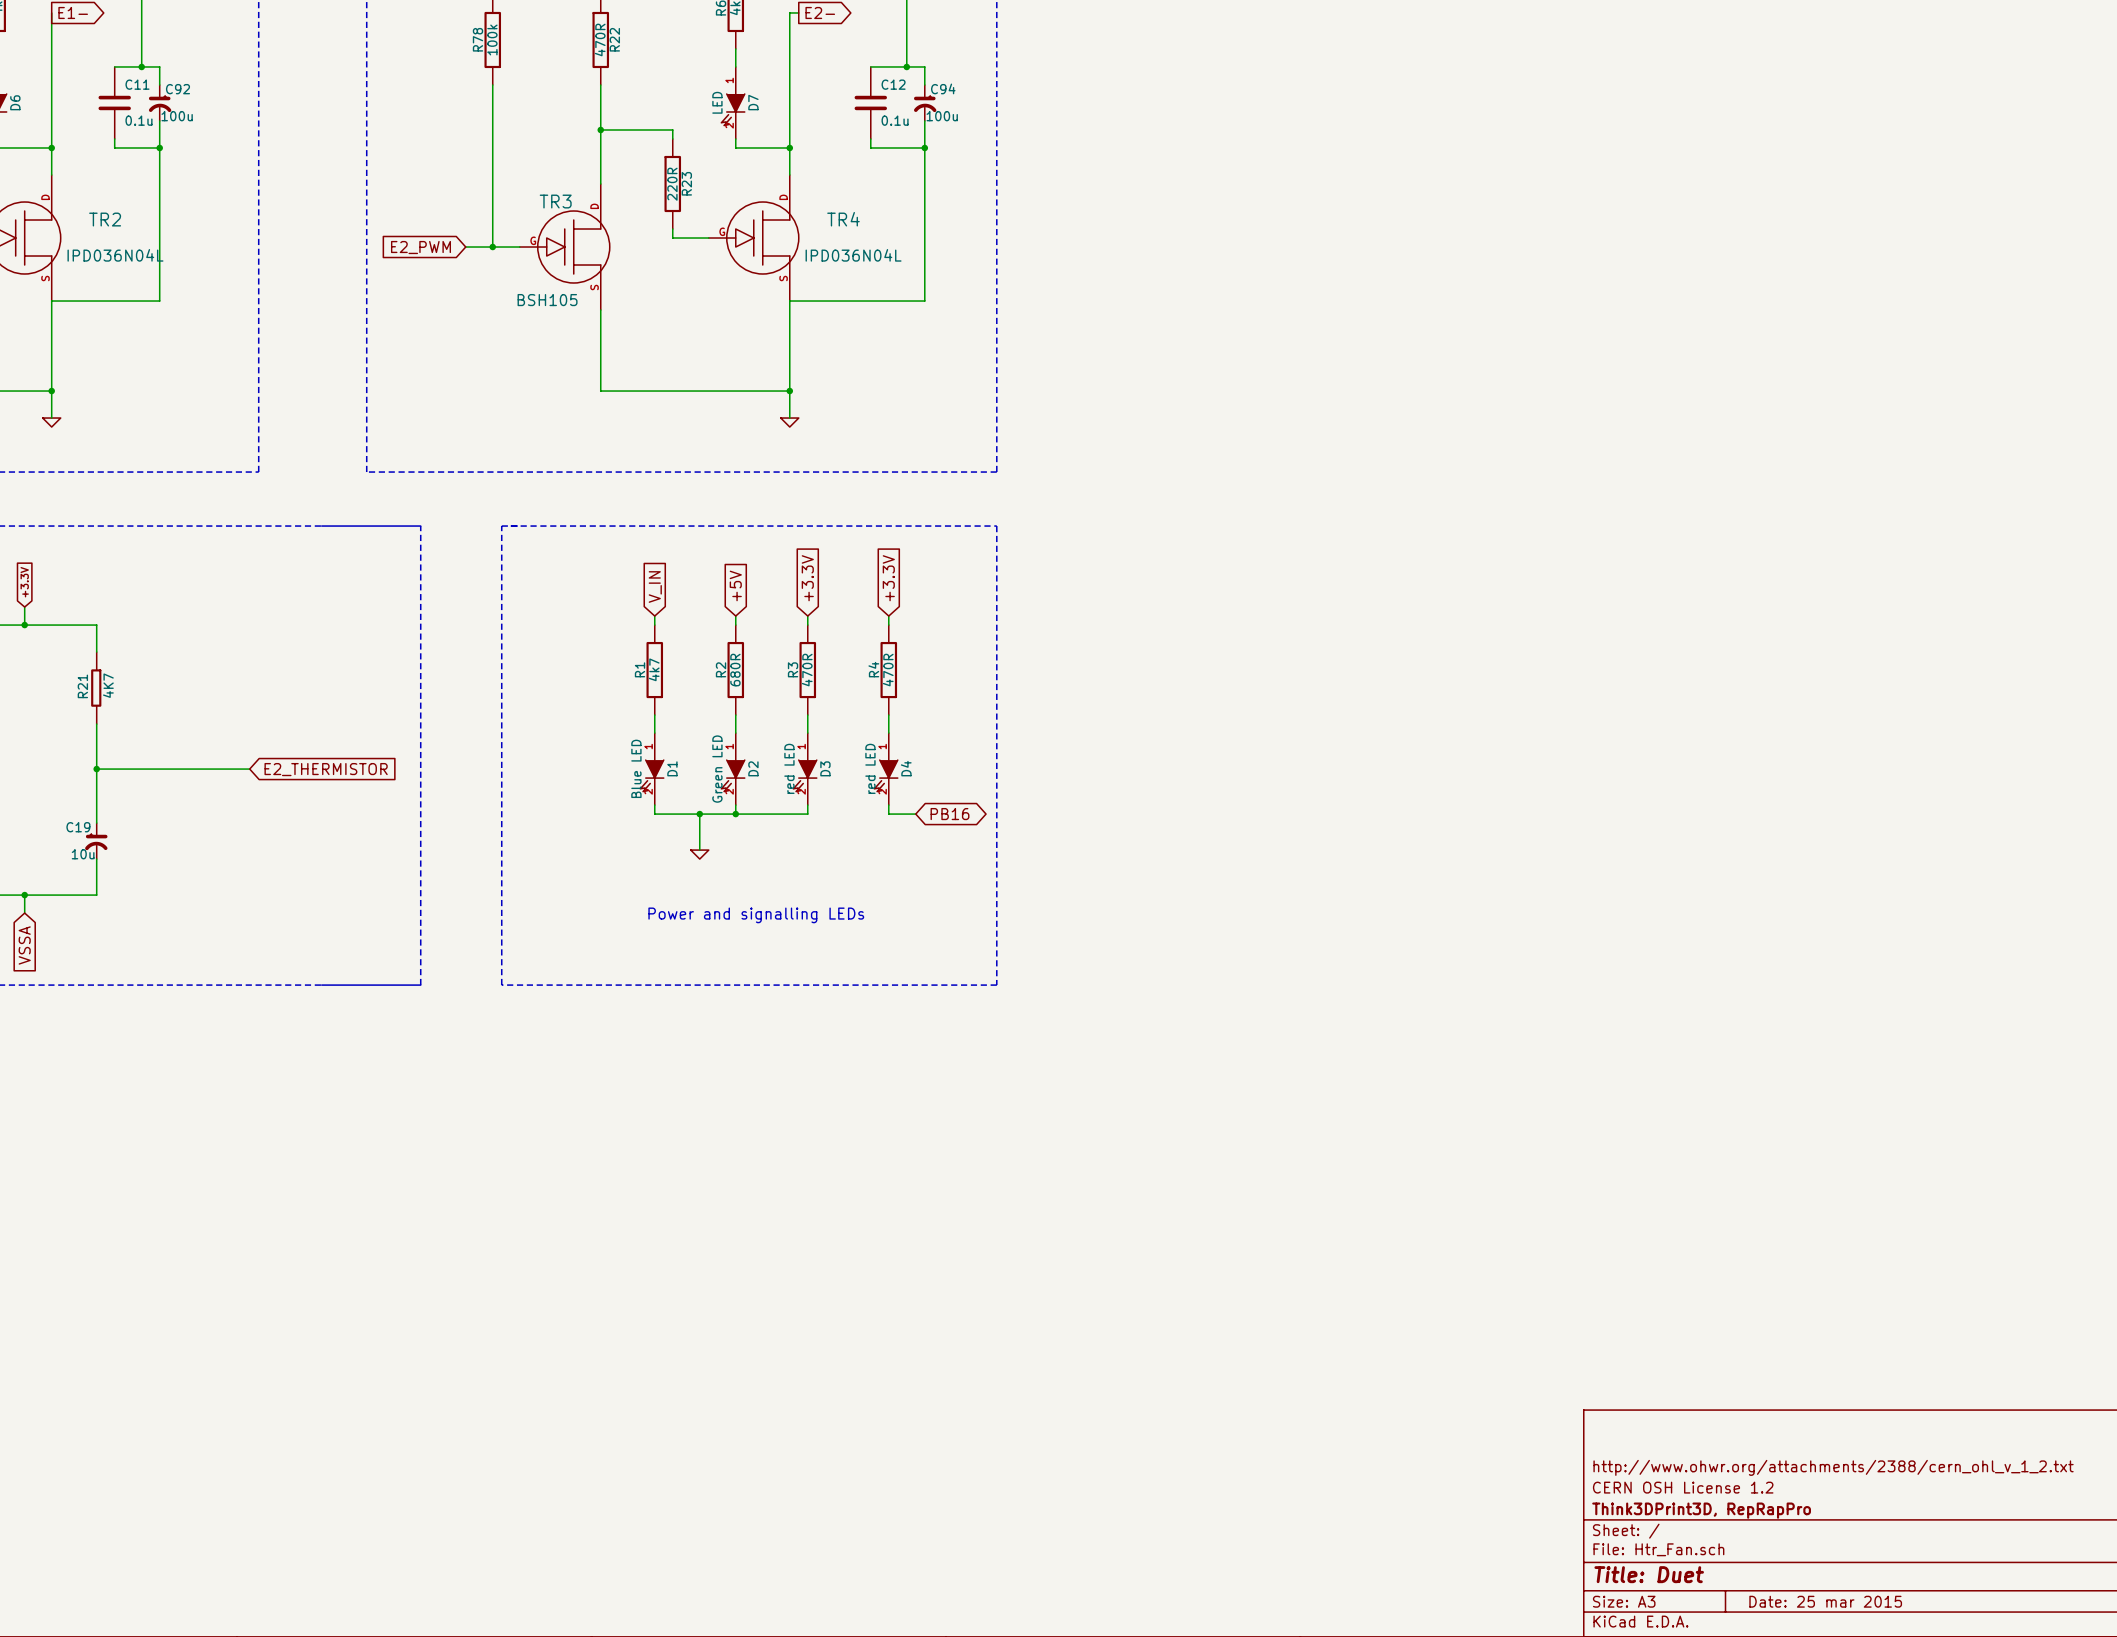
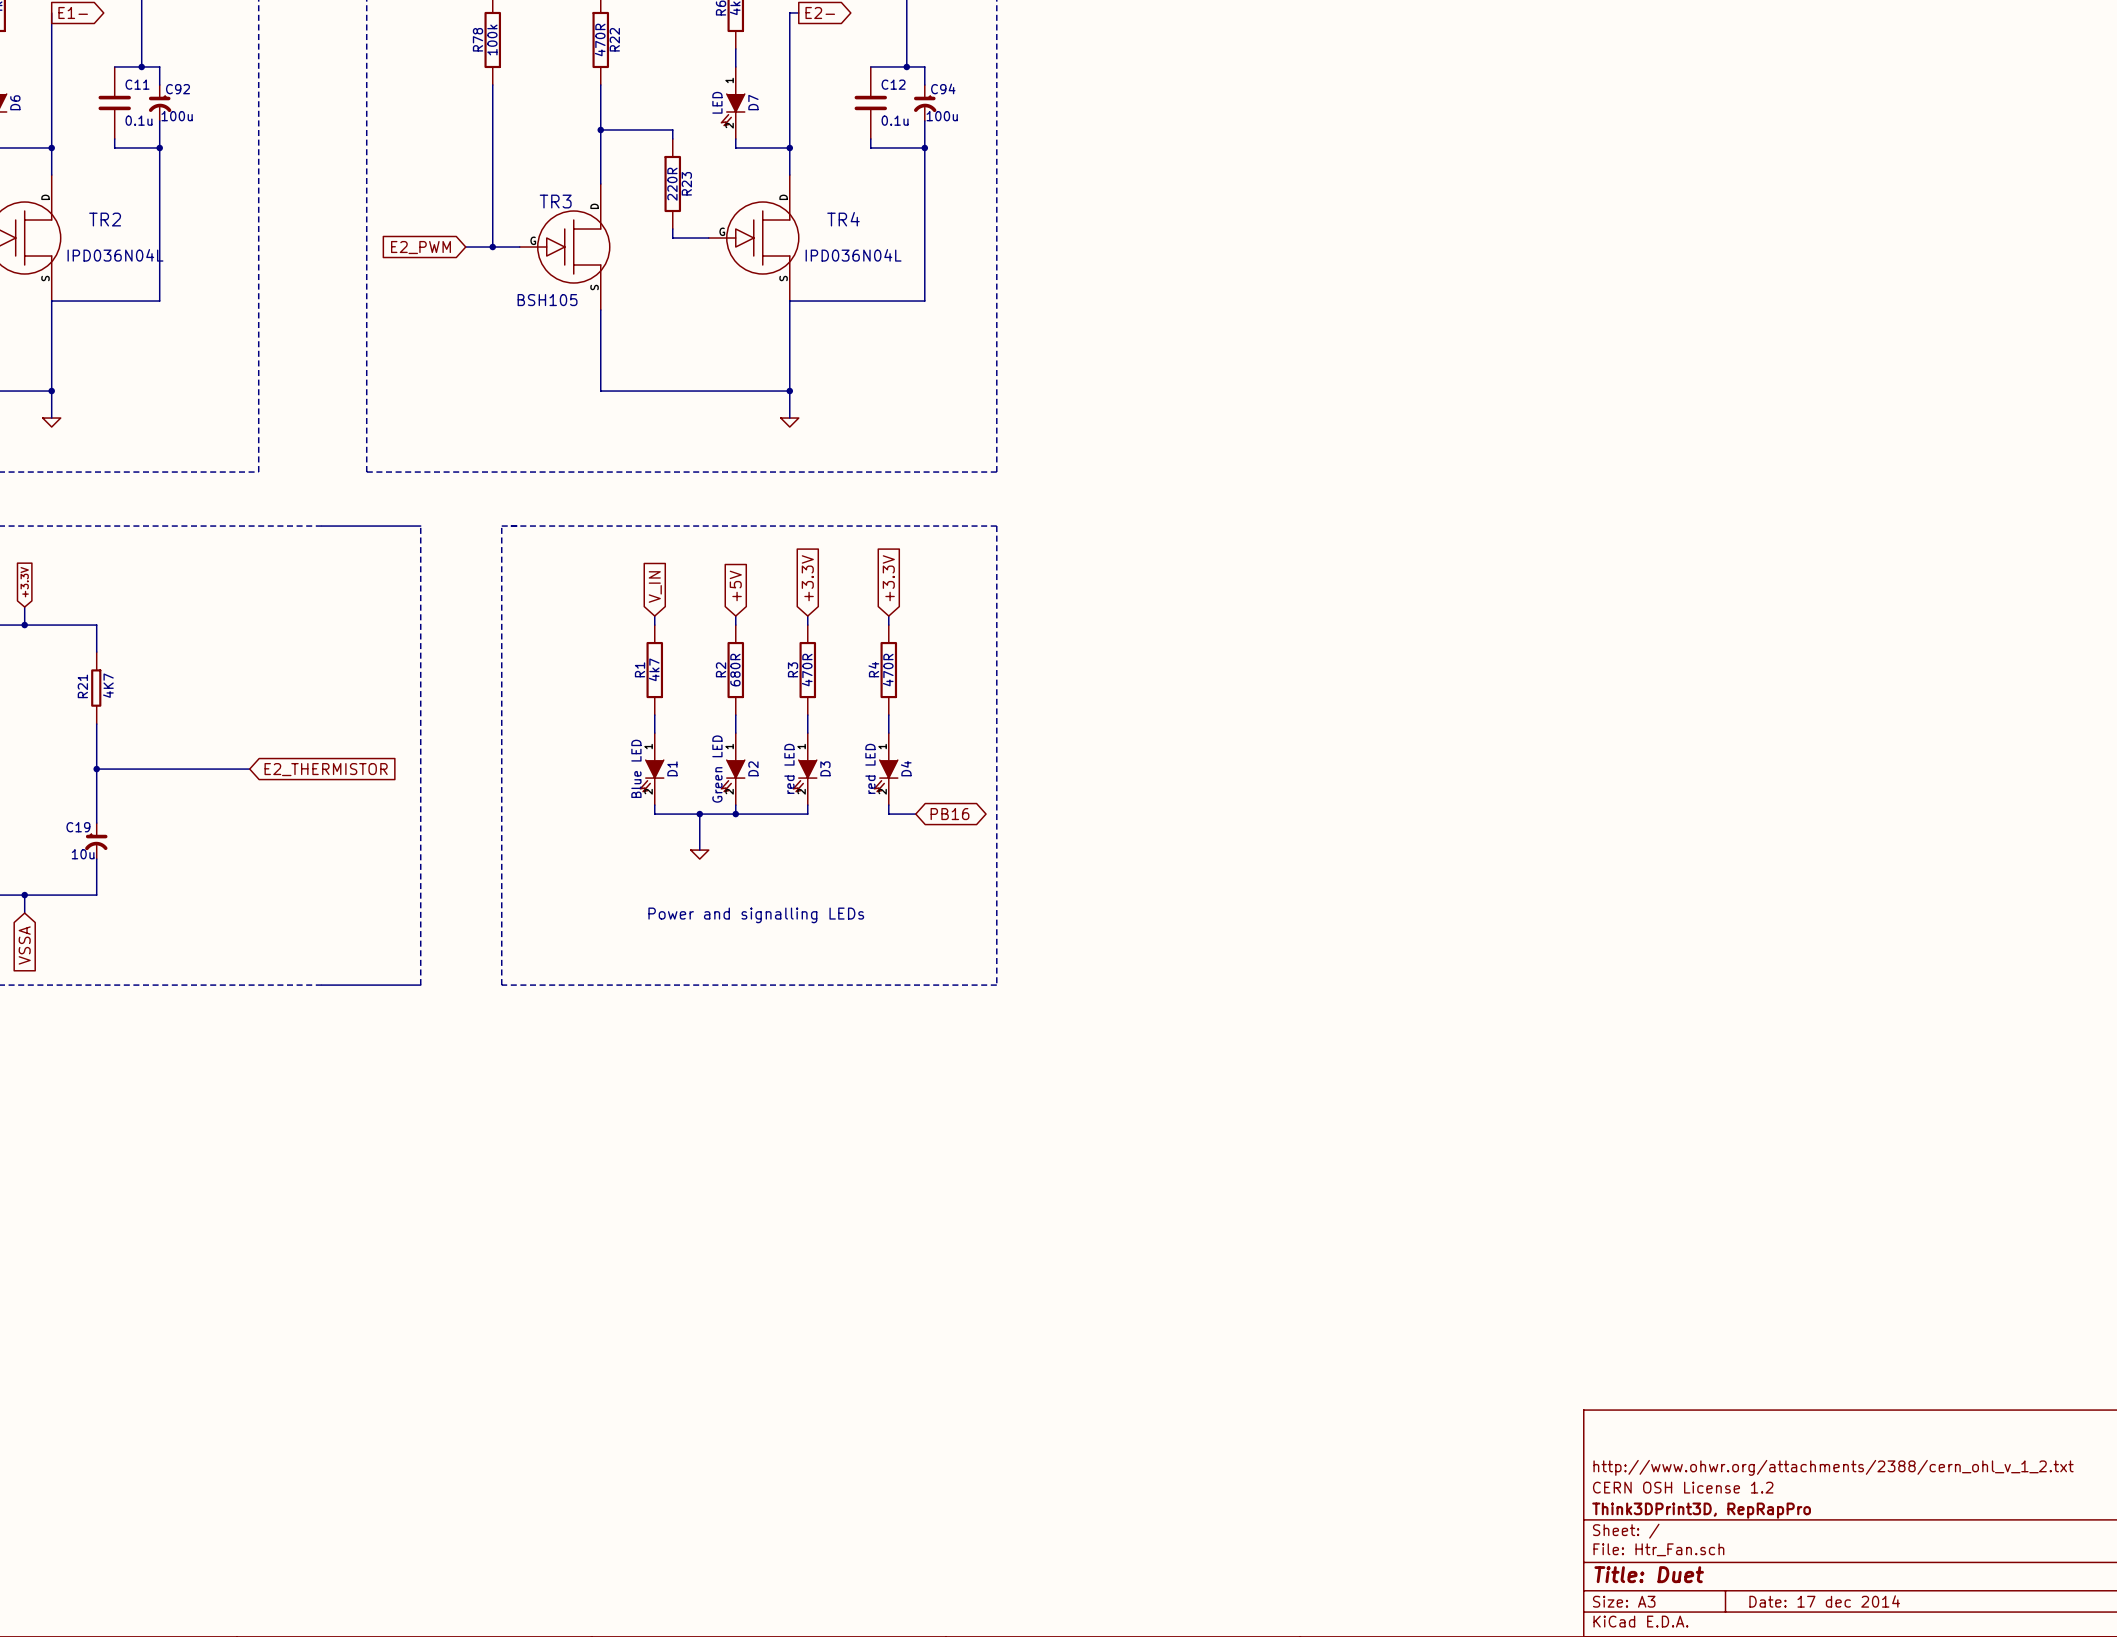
title block: Date: 25 mar 2015 (1825, 1601) -> Date: 17 dec 2014 (1824, 1601)

